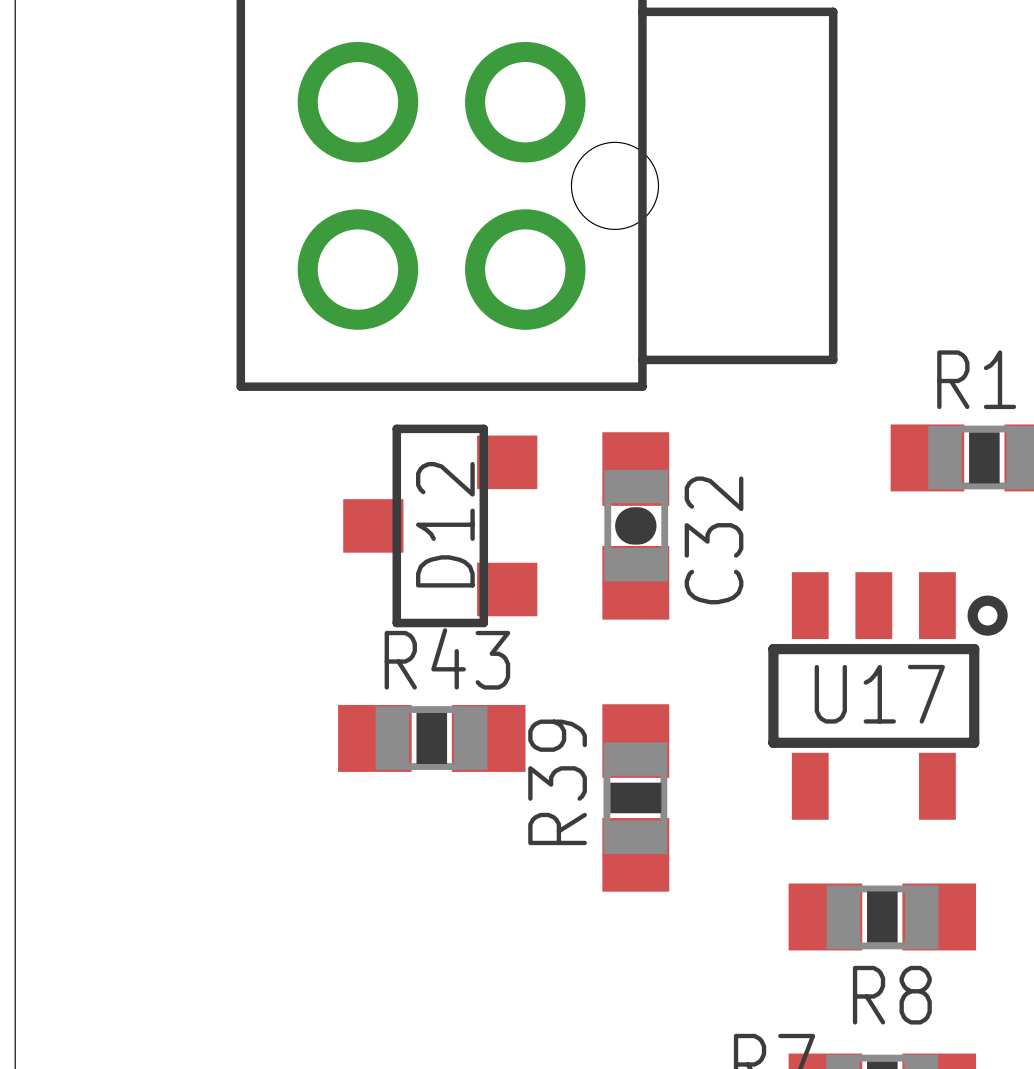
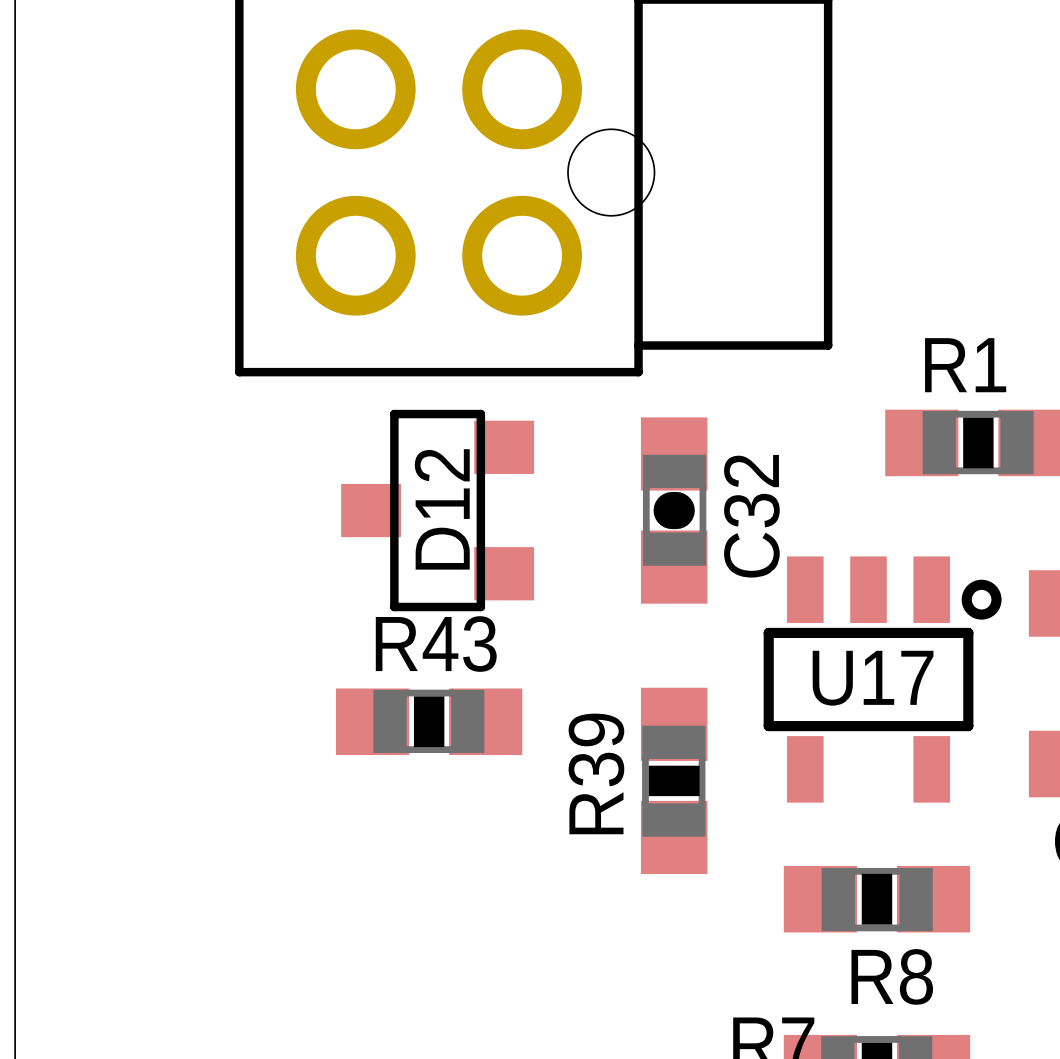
C32 position: (635, 525) -> (674, 510)
R39 position: (635, 797) -> (674, 780)

